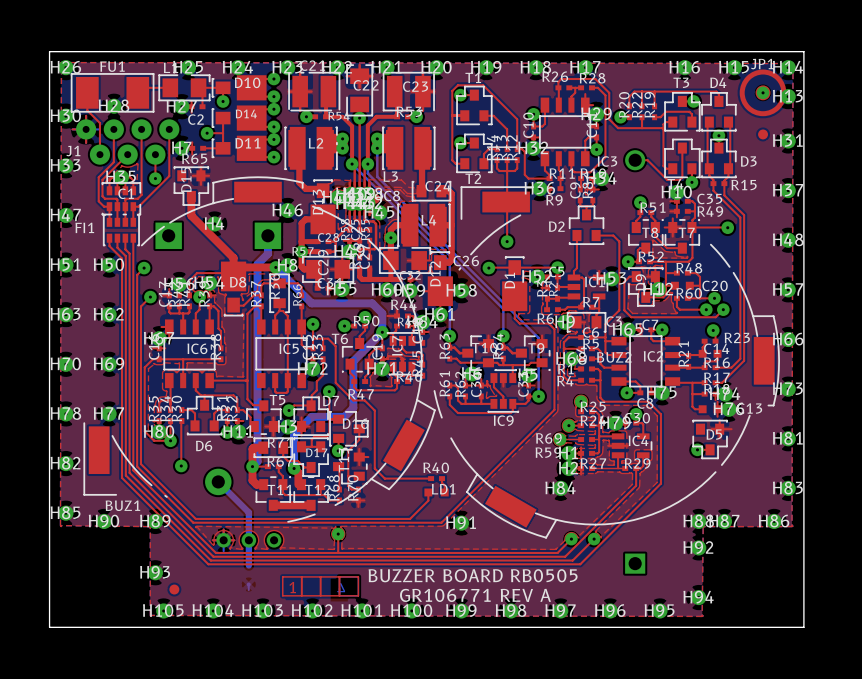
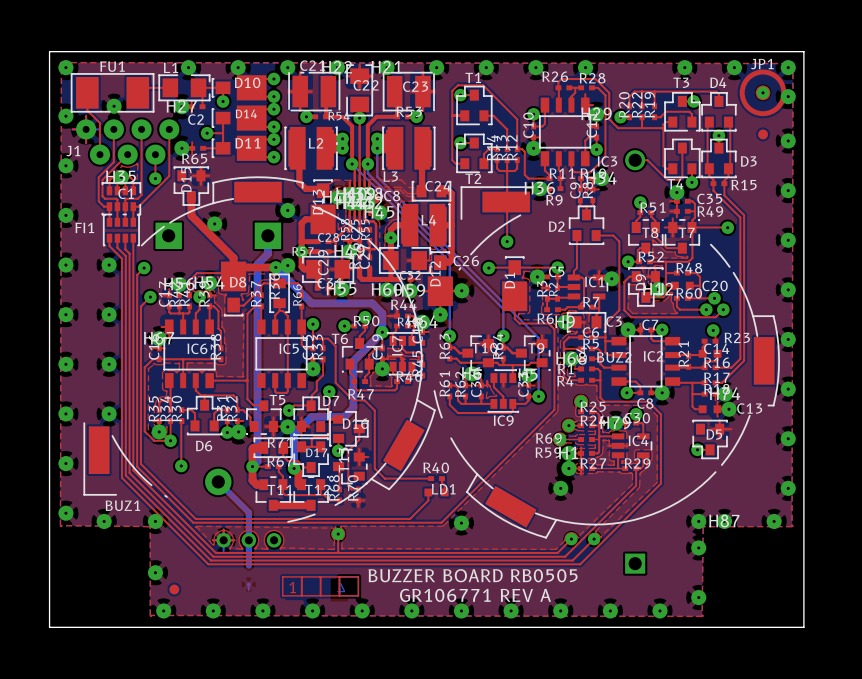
H26 name: H26 (65, 67) -> none
H25 name: H25 (188, 67) -> none
H24 name: H24 (237, 67) -> none
H23 name: H23 (287, 67) -> none
H20 name: H20 (436, 67) -> none
H19 name: H19 (486, 67) -> none
H18 name: H18 (535, 67) -> none
H17 name: H17 (585, 67) -> none
H16 name: H16 (684, 67) -> none
H15 name: H15 (734, 67) -> none
H14 name: H14 (788, 67) -> none
H13 name: H13 (787, 96) -> none
H28 name: H28 (114, 105) -> none
H30 name: H30 (65, 115) -> none
H31 name: H31 (787, 140) -> none
H7 name: H7 (181, 147) -> none
H32 name: H32 (533, 147) -> none
H33 name: H33 (65, 165) -> none
H37 name: H37 (788, 190) -> none
H10 name: H10 (676, 192) -> none
H46 name: H46 (287, 210) -> none
H47 name: H47 (65, 214) -> none
H4 name: H4 (214, 223) -> none
H48 name: H48 (788, 239) -> none
H51 name: H51 (65, 264) -> none
H50 name: H50 (108, 264) -> none
H8 name: H8 (287, 265) -> none
H52 name: H52 (537, 276) -> none
H53 name: H53 (611, 278) -> none
H57 name: H57 (788, 289) -> none
H58 name: H58 (461, 290) -> none
H63 name: H63 (65, 314) -> none
H62 name: H62 (108, 314) -> none
H61 name: H61 (439, 314) -> none
H65 name: H65 (627, 329) -> none
H66 name: H66 (788, 339) -> none
H70 name: H70 (65, 363) -> none
H69 name: H69 (108, 363) -> none
H72 name: H72 (312, 368) -> none
H71 name: H71 (381, 368) -> none
H73 name: H73 (787, 388) -> none
H75 name: H75 (661, 392) -> none
H76 name: H76 (728, 408) -> none
H78 name: H78 (65, 413) -> none
H77 name: H77 (108, 413) -> none
H3 name: H3 (287, 426) -> none
H80 name: H80 (159, 431) -> none
H11 name: H11 (238, 431) -> none
H81 name: H81 (787, 438) -> none
H82 name: H82 (65, 463) -> none
H2 name: H2 (568, 468) -> none
H84 name: H84 (560, 487) -> none
H83 name: H83 (787, 487) -> none
H85 name: H85 (65, 512) -> none
H90 name: H90 (103, 521) -> none
H89 name: H89 (155, 521) -> none
H88 name: H88 (698, 521) -> none
H86 name: H86 (774, 521) -> none
H91 name: H91 (461, 522) -> none
H92 name: H92 (698, 547) -> none
H93 name: H93 (155, 572) -> none
H94 name: H94 (698, 597) -> none
H105 name: H105 (163, 610) -> none
H104 name: H104 (213, 610) -> none
H103 name: H103 (262, 610) -> none
H102 name: H102 (312, 610) -> none
H101 name: H101 (361, 610) -> none
H100 name: H100 (411, 610) -> none
H99 name: H99 (461, 610) -> none
H98 name: H98 (511, 610) -> none
H97 name: H97 (560, 610) -> none
H96 name: H96 (610, 610) -> none
H95 name: H95 (659, 610) -> none

